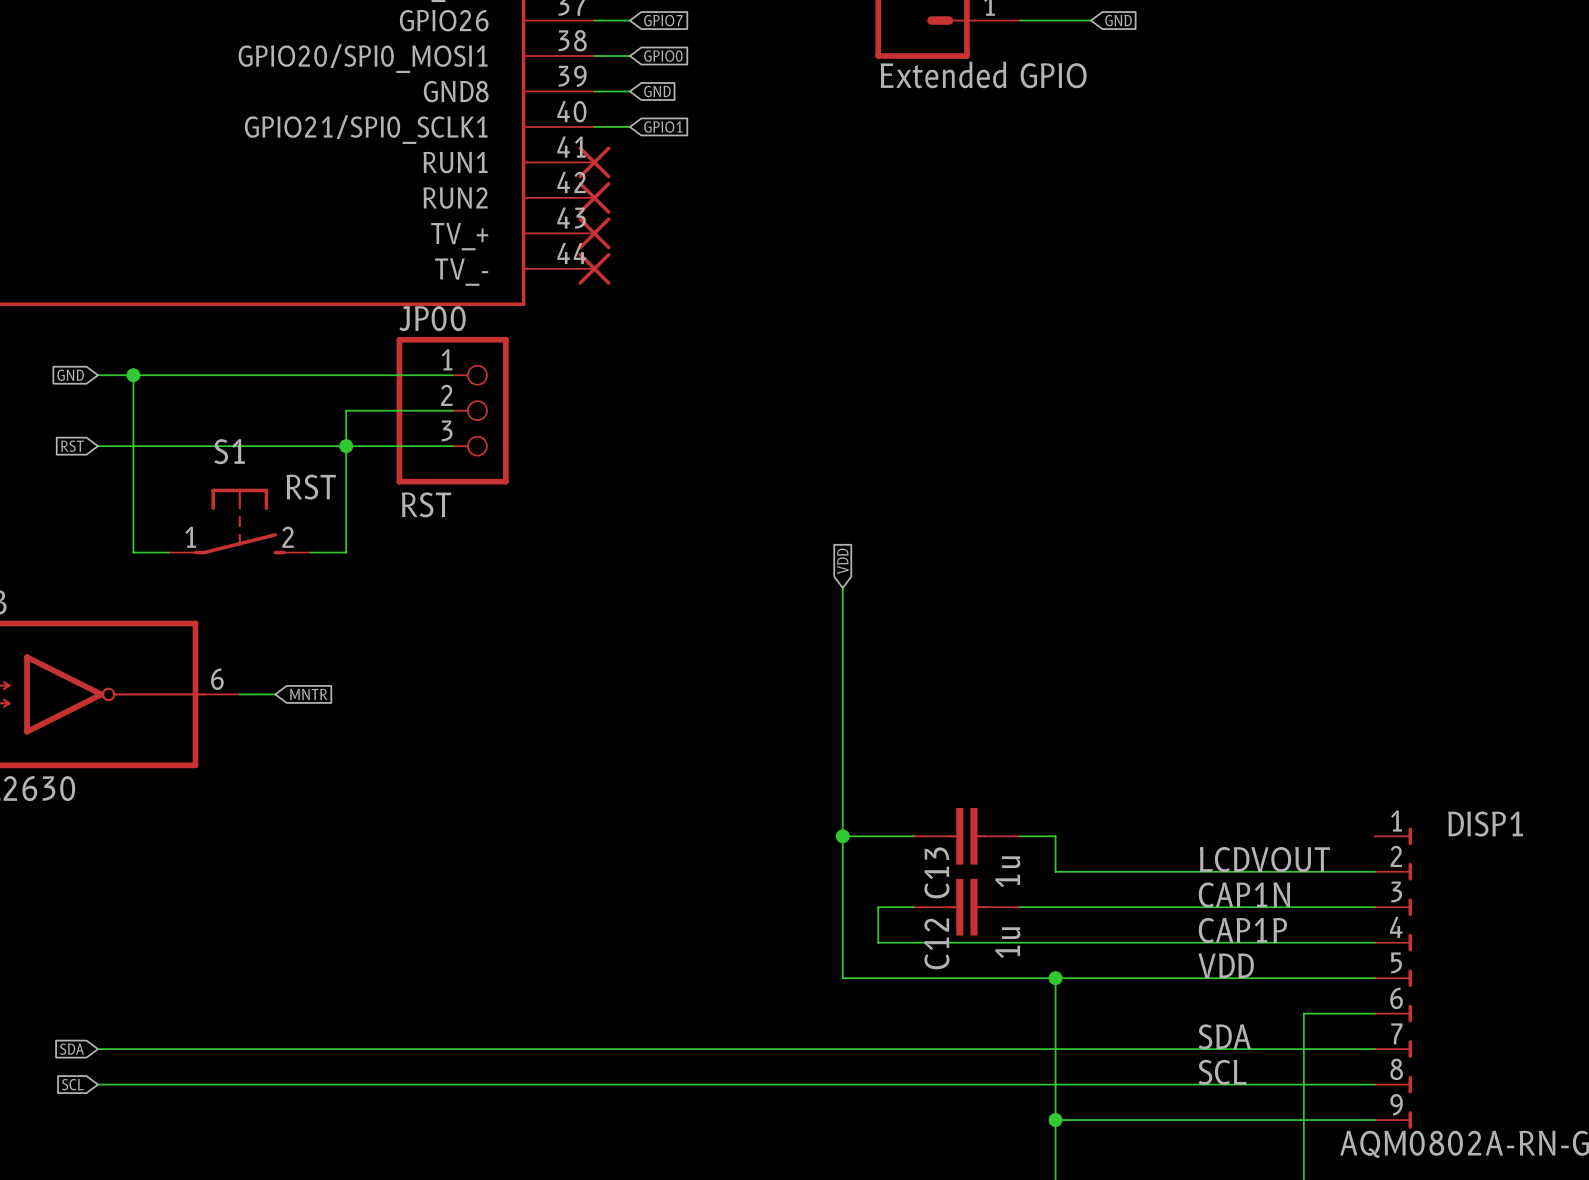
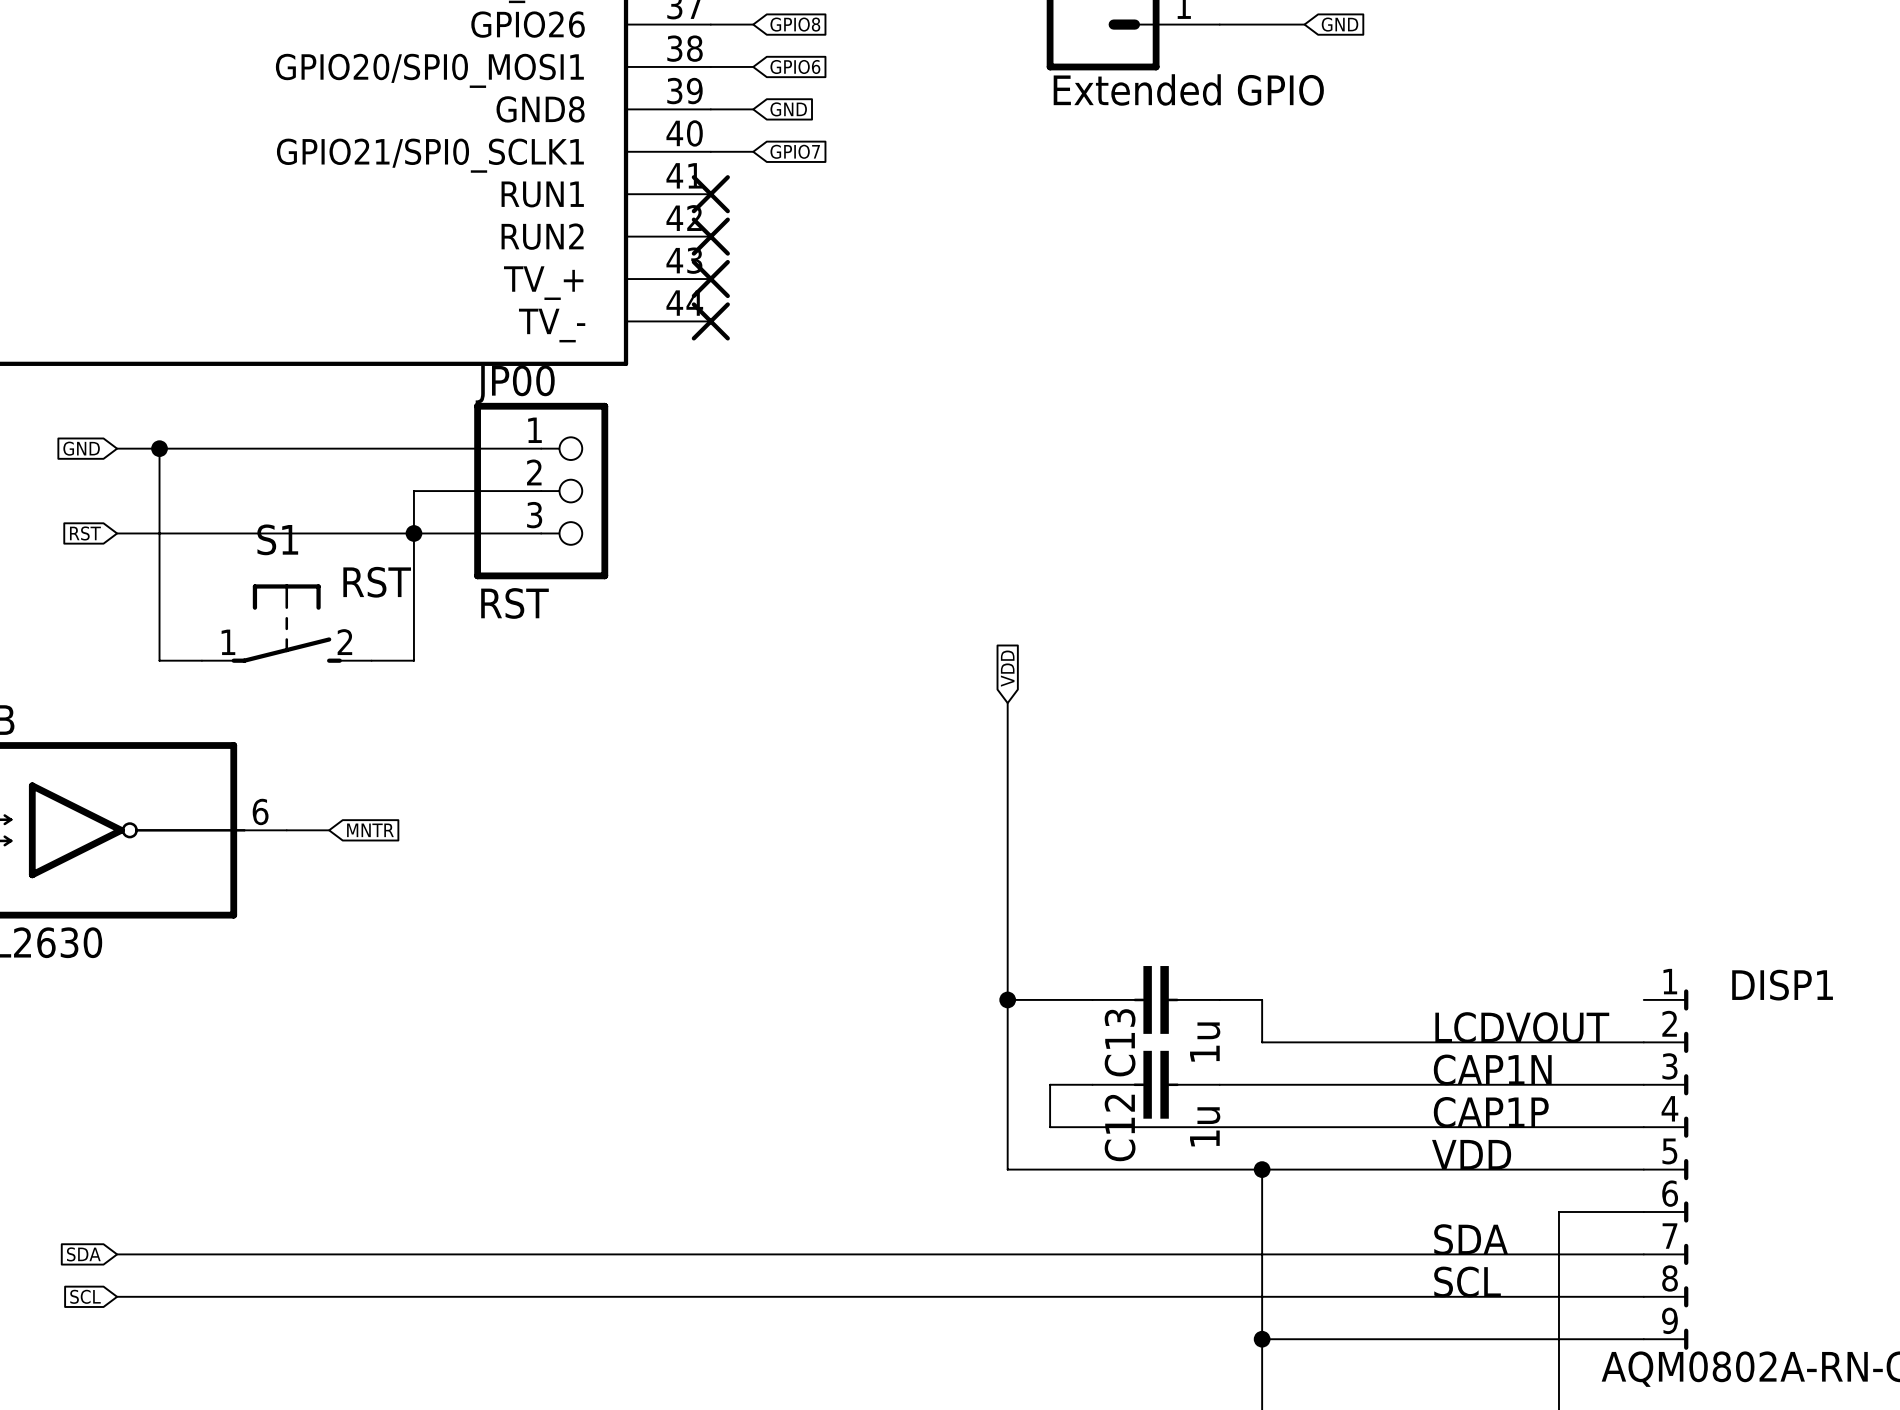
global label: GPIO7 (663, 20) -> GPIO8 (795, 24)
global label: GPIO0 (663, 56) -> GPIO6 (795, 66)
global label: GPIO1 (663, 127) -> GPIO7 (795, 151)

